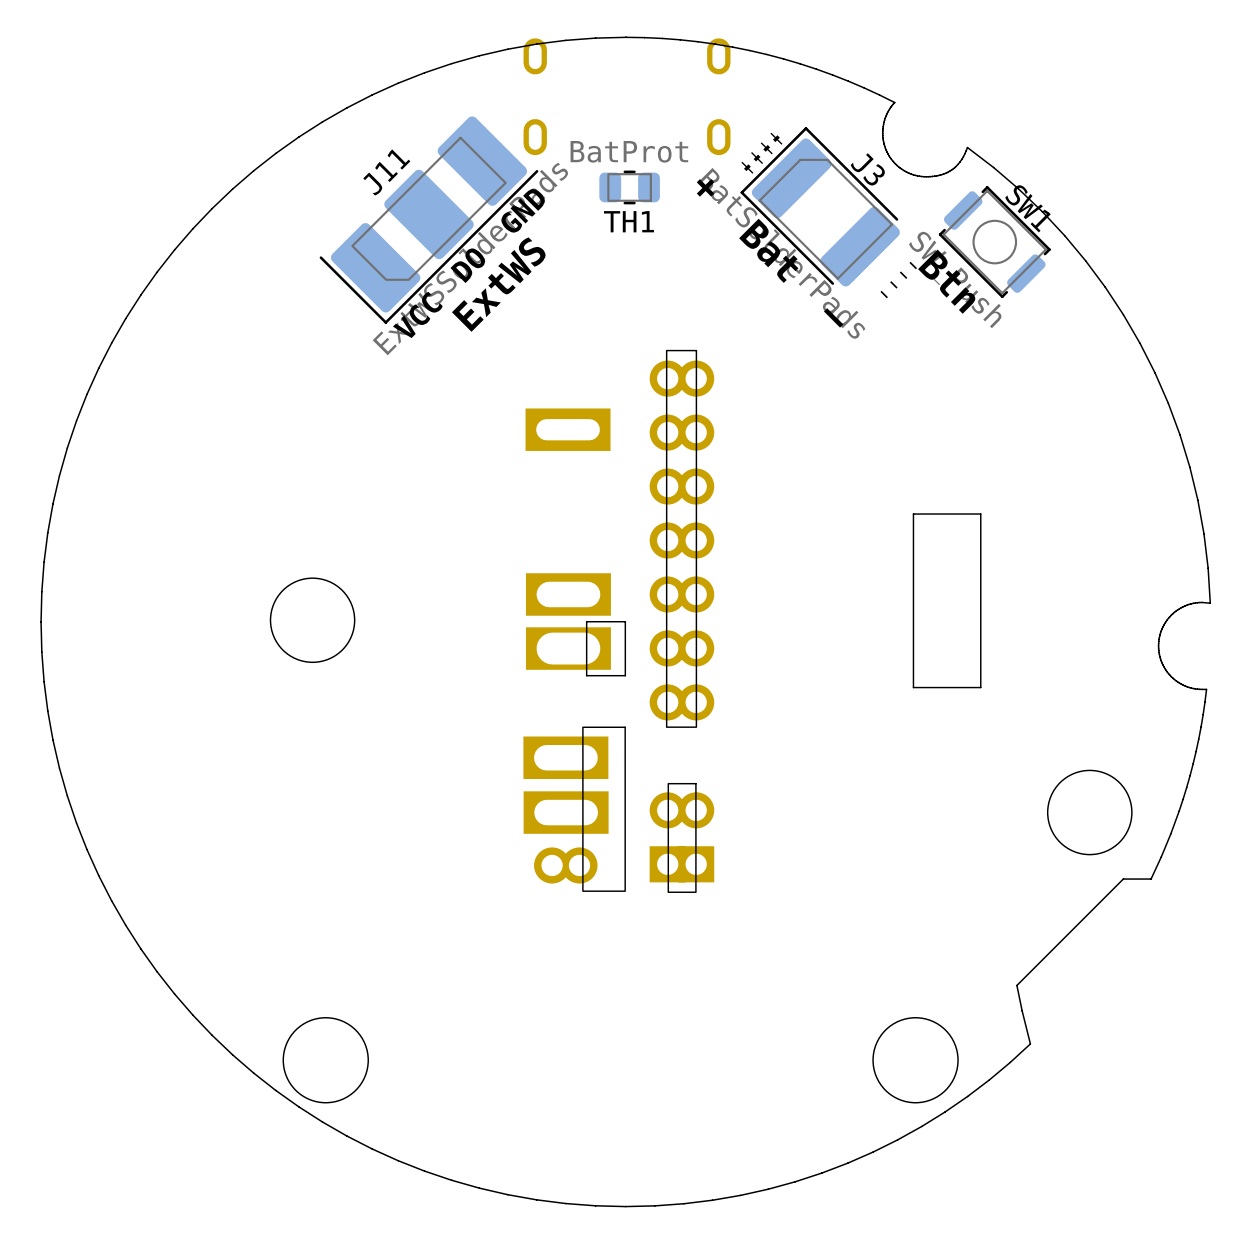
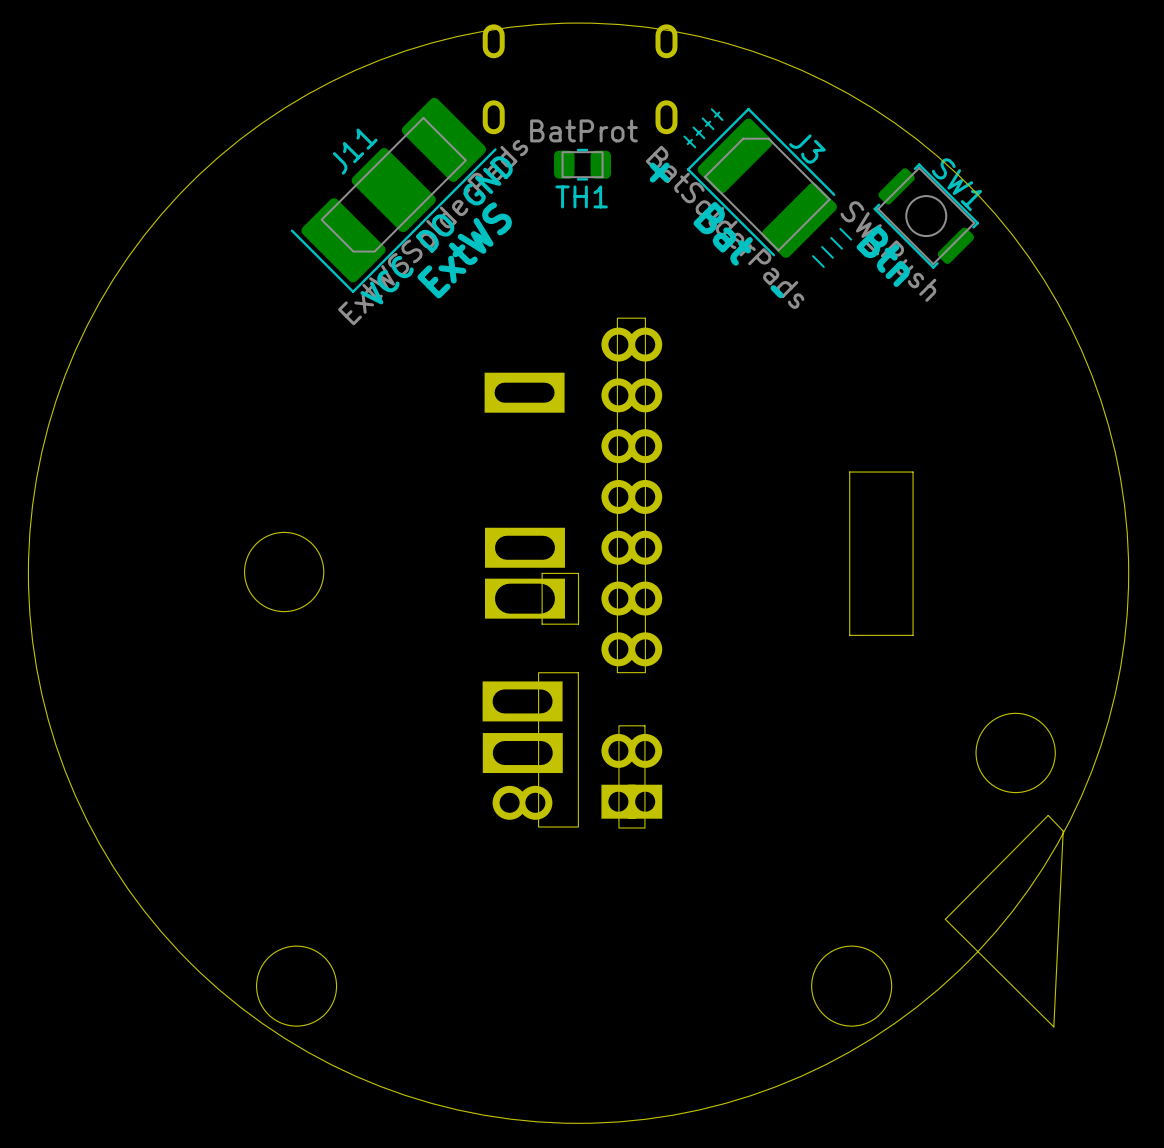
round board edge: none -> [27, 22, 1130, 1124]
board edge: (626, 37) (680, 39) (732, 47) (783, 58) (848, 81) (894, 102) (885, 118) (882, 137) (889, 155) (901, 169) (921, 176) (943, 174) (958, 164) (967, 147) (993, 167) (1042, 211) (1085, 260) (1123, 314) (1155, 372) (1168, 403) (1189, 467) (1197, 500) (1208, 568) (1210, 603) (1193, 603) (1177, 609) (1164, 623) (1159, 639) (1160, 658) (1169, 675) (1187, 686) (1206, 689) (1193, 763) (1170, 834) (1151, 879) (1123, 879) (1016, 985) (1030, 1043) (989, 1079) (945, 1112) (897, 1139) (847, 1163) (795, 1181) (740, 1195) (683, 1203) (625, 1206) (565, 1203) (507, 1194) (451, 1180) (398, 1160) (346, 1136) (298, 1106) (253, 1073) (212, 1035) (174, 993) (140, 948) (111, 900) (86, 849) (67, 795) (52, 739) (44, 681) (41, 621) (44, 562) (52, 504) (67, 448) (86, 394) (111, 343) (140, 295) (174, 250) (212, 208) (253, 170) (298, 137) (346, 107) (398, 83) (451, 63) (507, 49) (565, 40) (626, 37) -> none
board edge: none -> (1048, 815) (1063, 831) (1053, 1026) (945, 919) (1048, 815)

